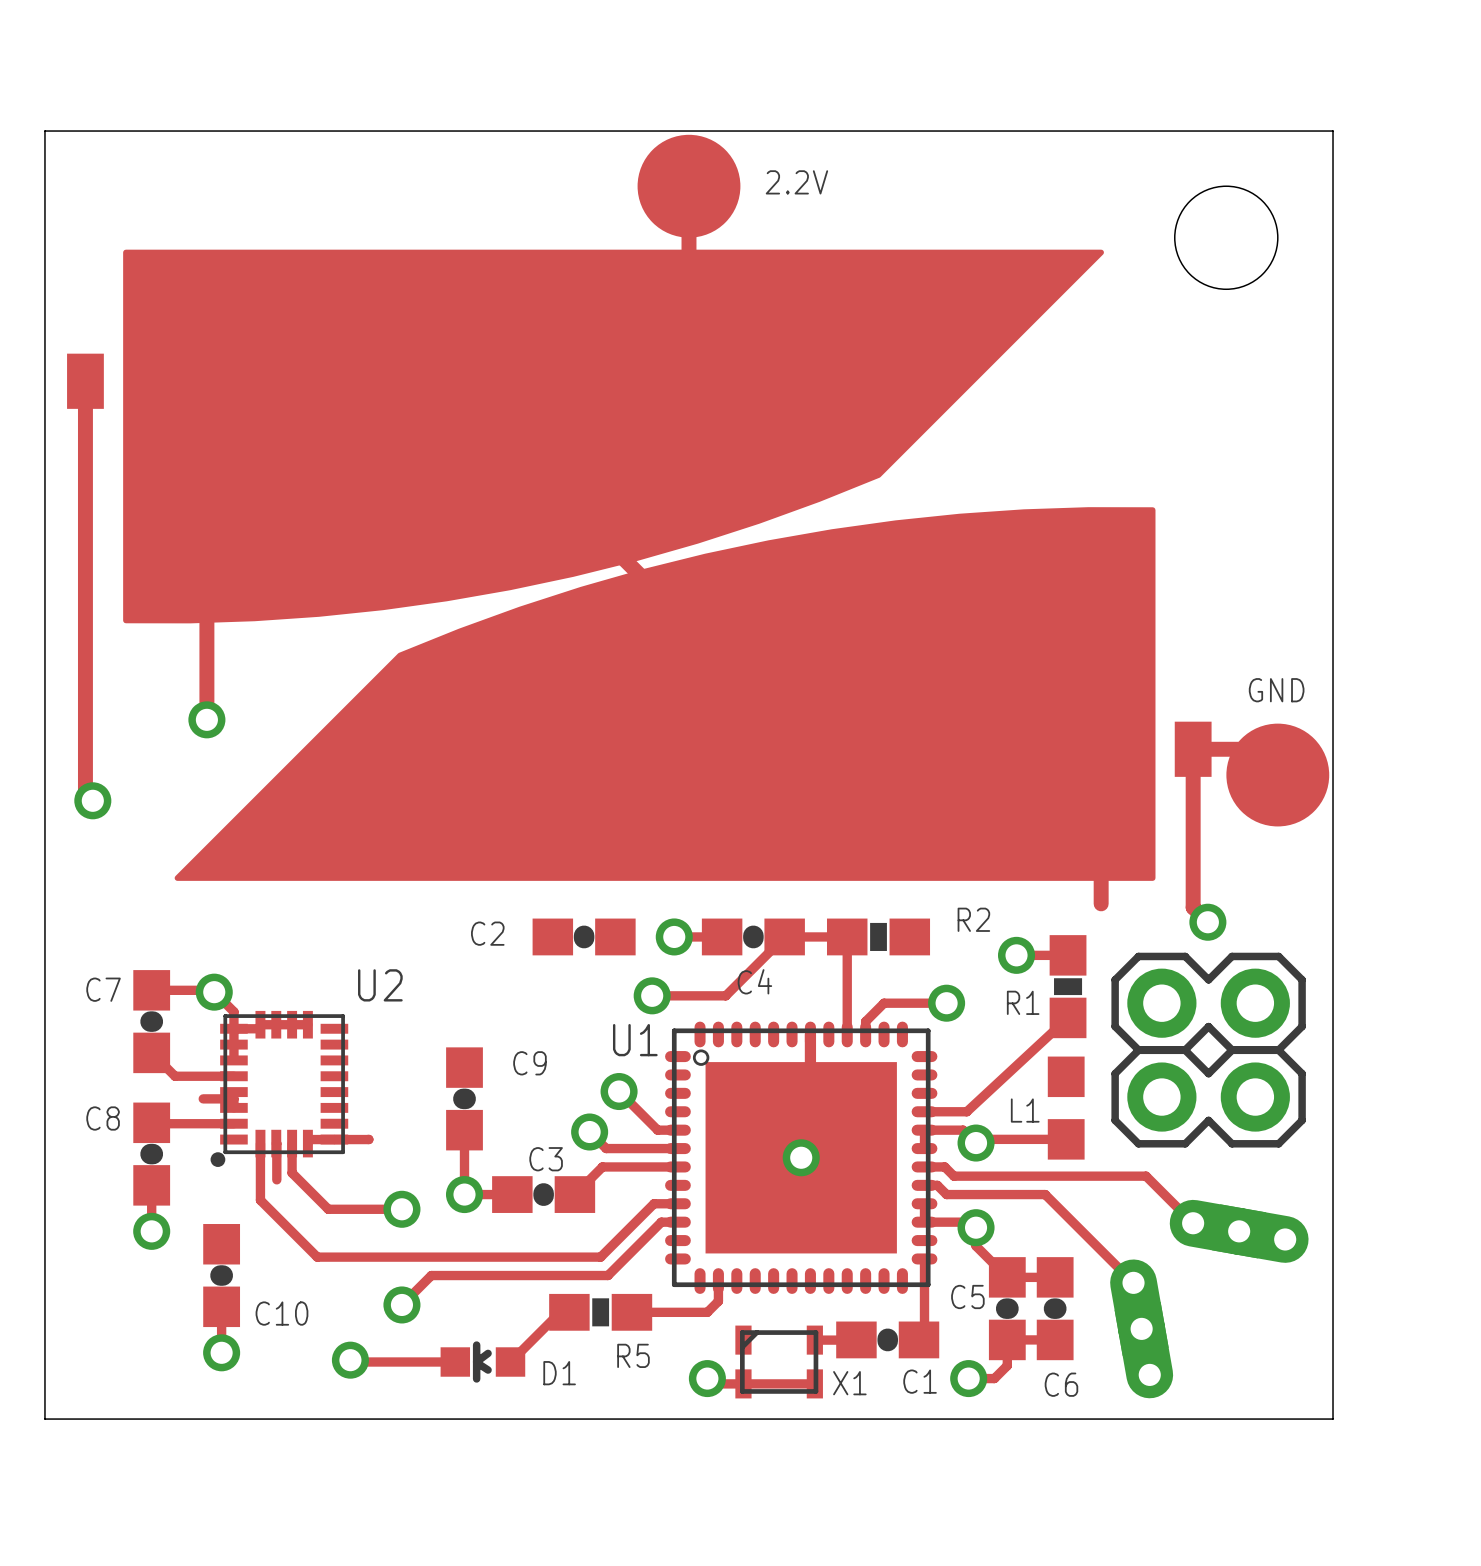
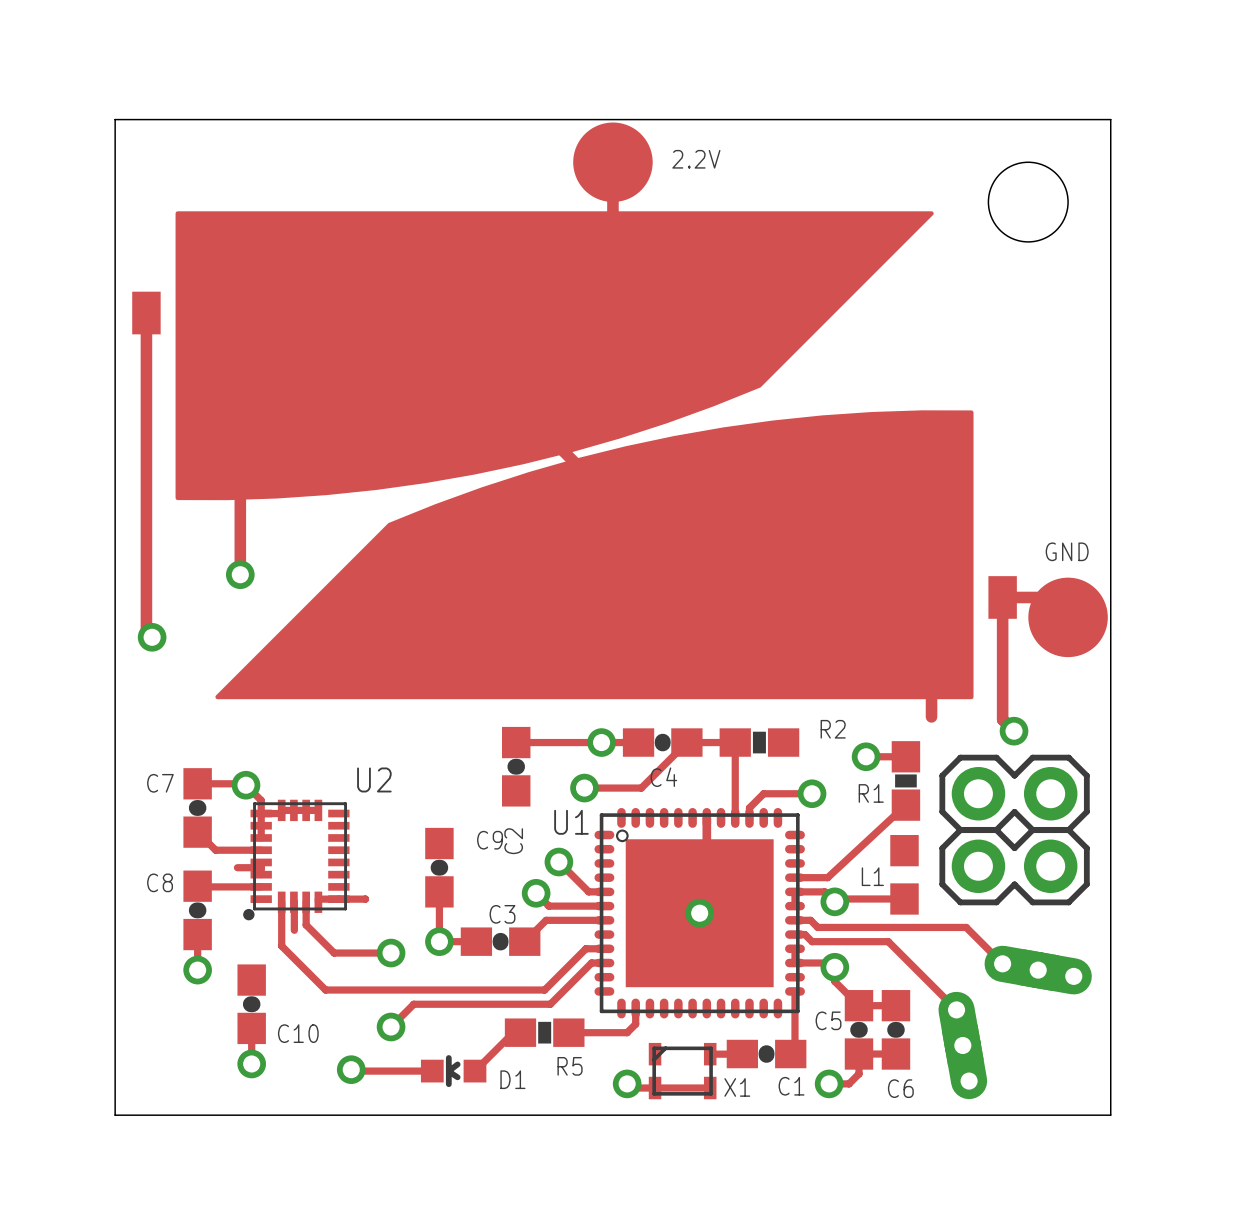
C2 name position: C2 (487, 933) -> C2 (513, 841)
track: none -> (516, 742) (601, 742)
C2 rotation: 0° (584, 936) -> 90° clockwise (516, 766)

